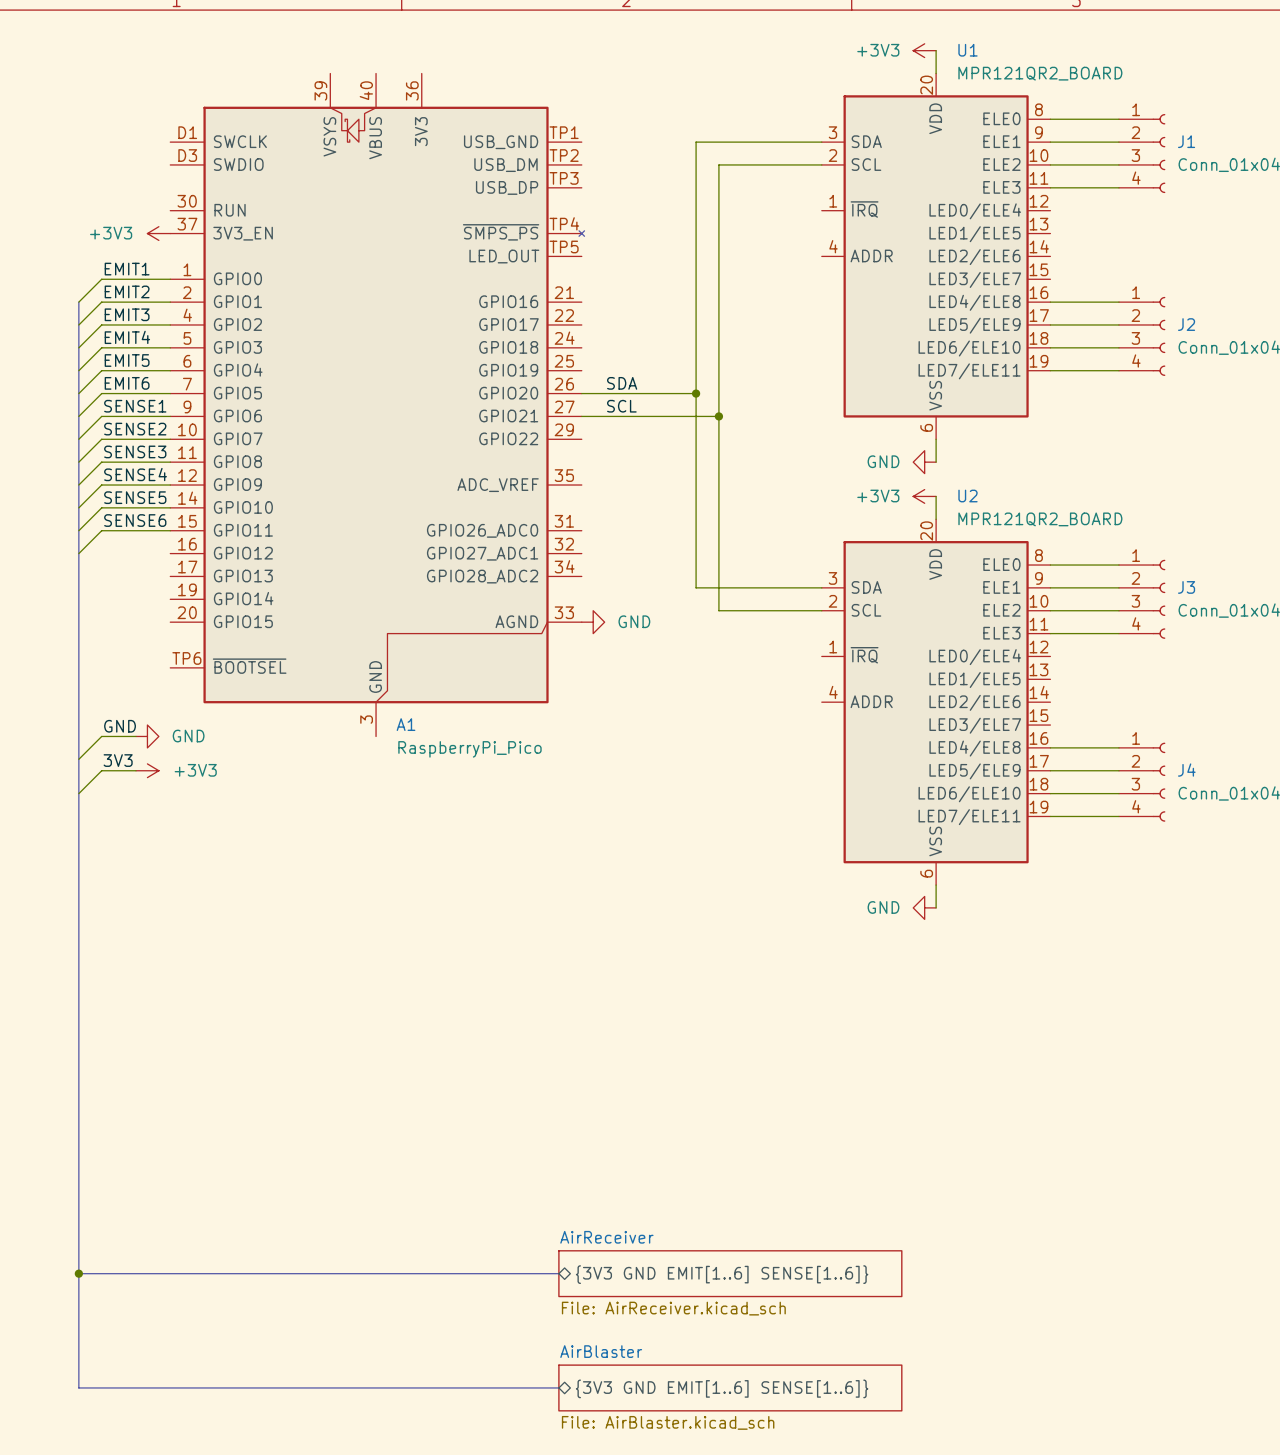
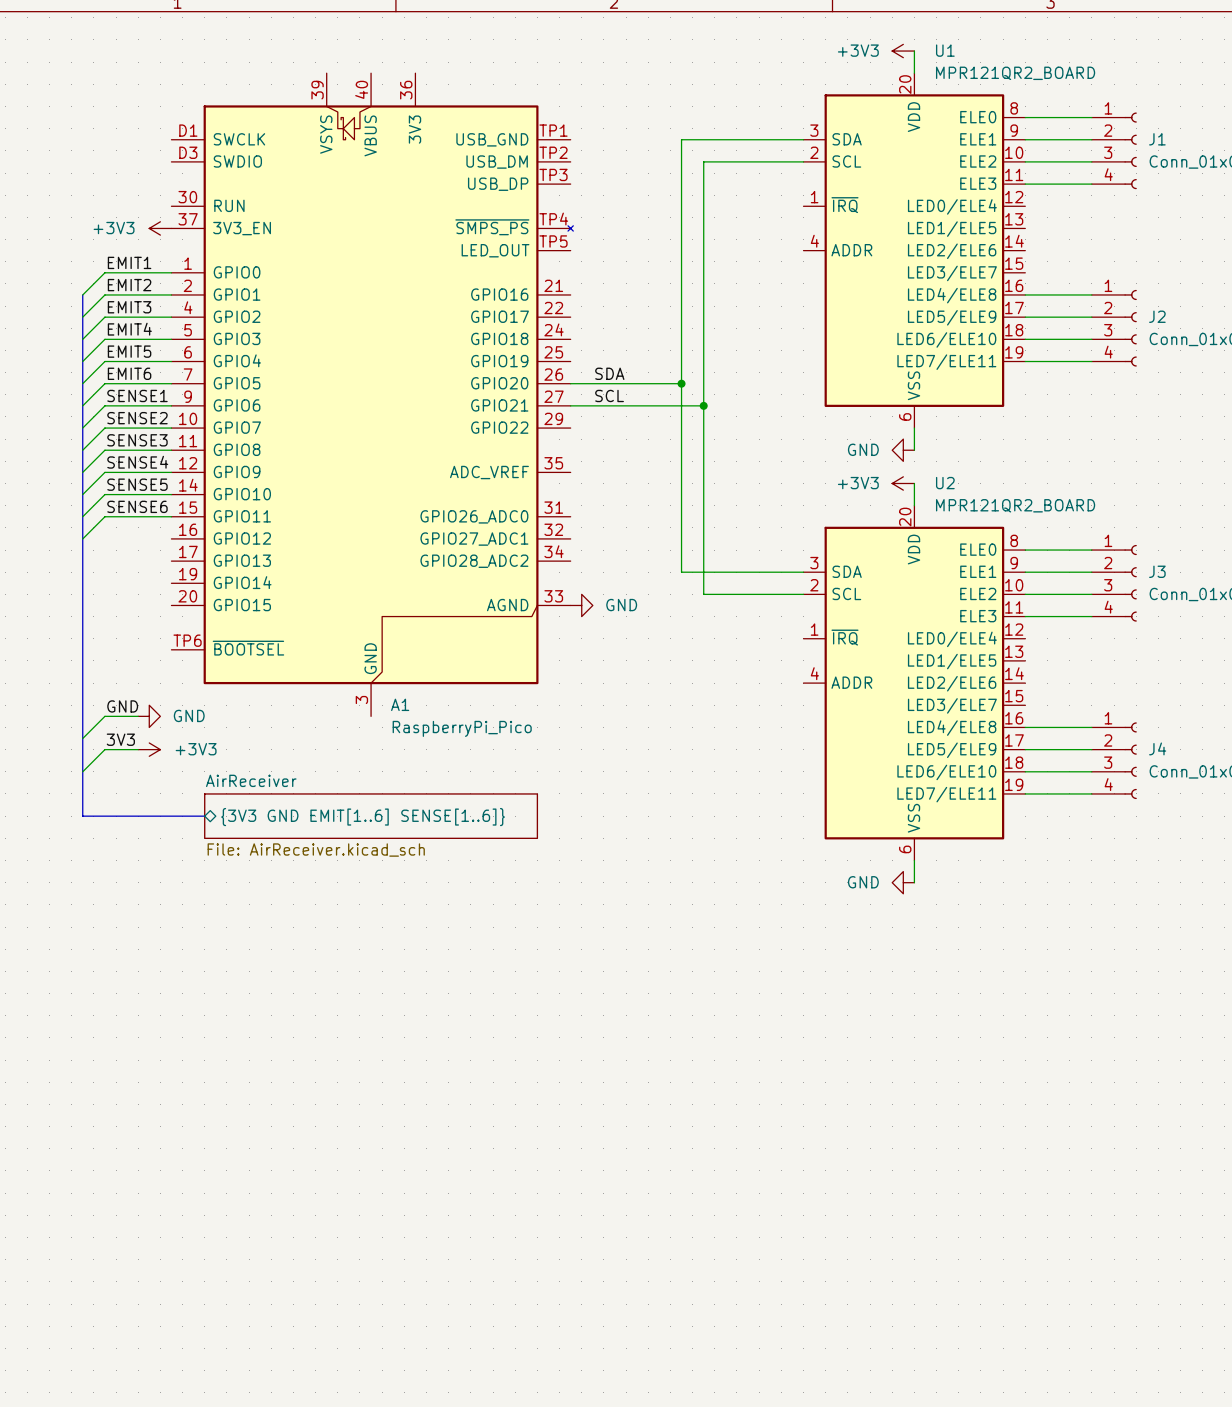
bus: (78, 839) (78, 1387) (558, 1387) -> (82, 816) (204, 816)
sheet AirReceiver: none -> File: AirReceiver.kicad_sch (371, 816)
sheet pin: none -> {3V3 GND EMIT[1..6] SENSE[1..6]} (363, 817)
bus: (78, 1273) (558, 1273) -> none
junction: (78, 1273) -> none
sheet AirReceiver: File: AirReceiver.kicad_sch (730, 1273) -> none
sheet pin: {3V3 GND EMIT[1..6] SENSE[1..6]} (722, 1274) -> none
sheet AirBlaster: File: AirBlaster.kicad_sch (730, 1387) -> none
sheet pin: {3V3 GND EMIT[1..6] SENSE[1..6]} (722, 1388) -> none

